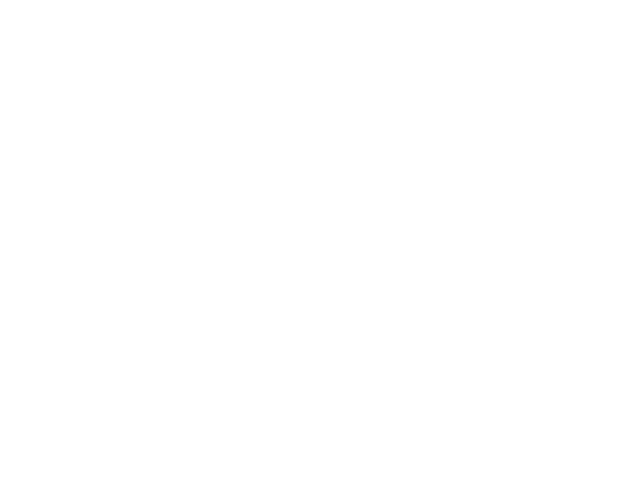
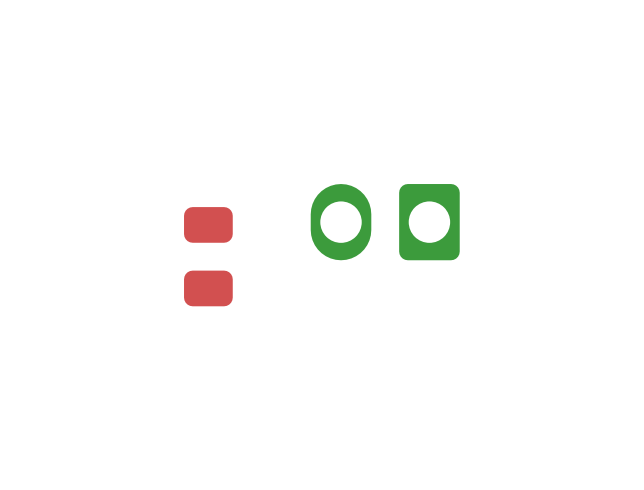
part: none -> (385, 222)
part: none -> (208, 256)

